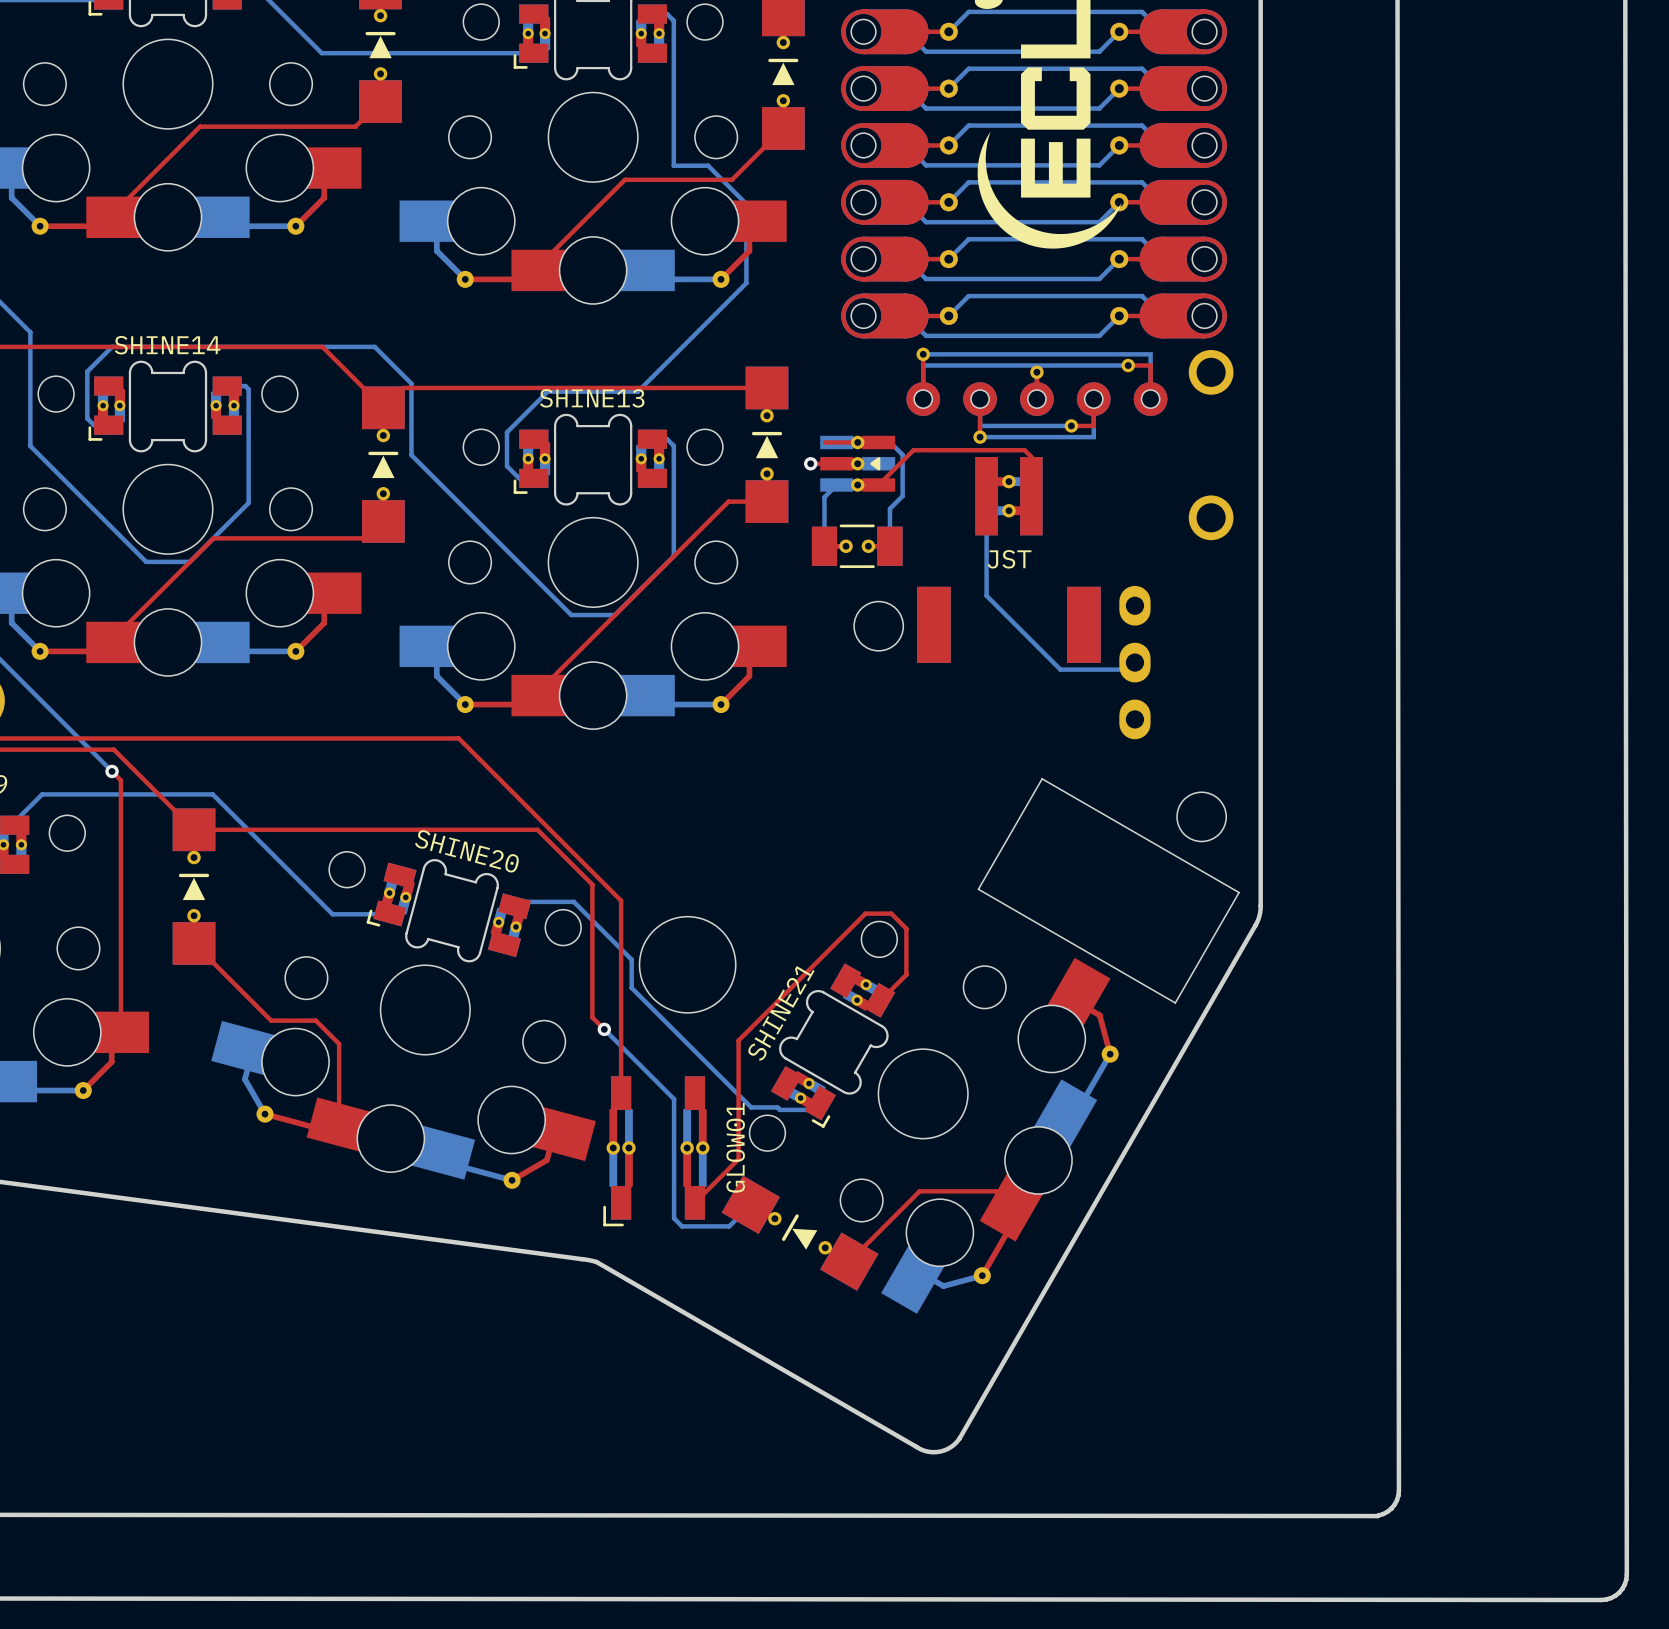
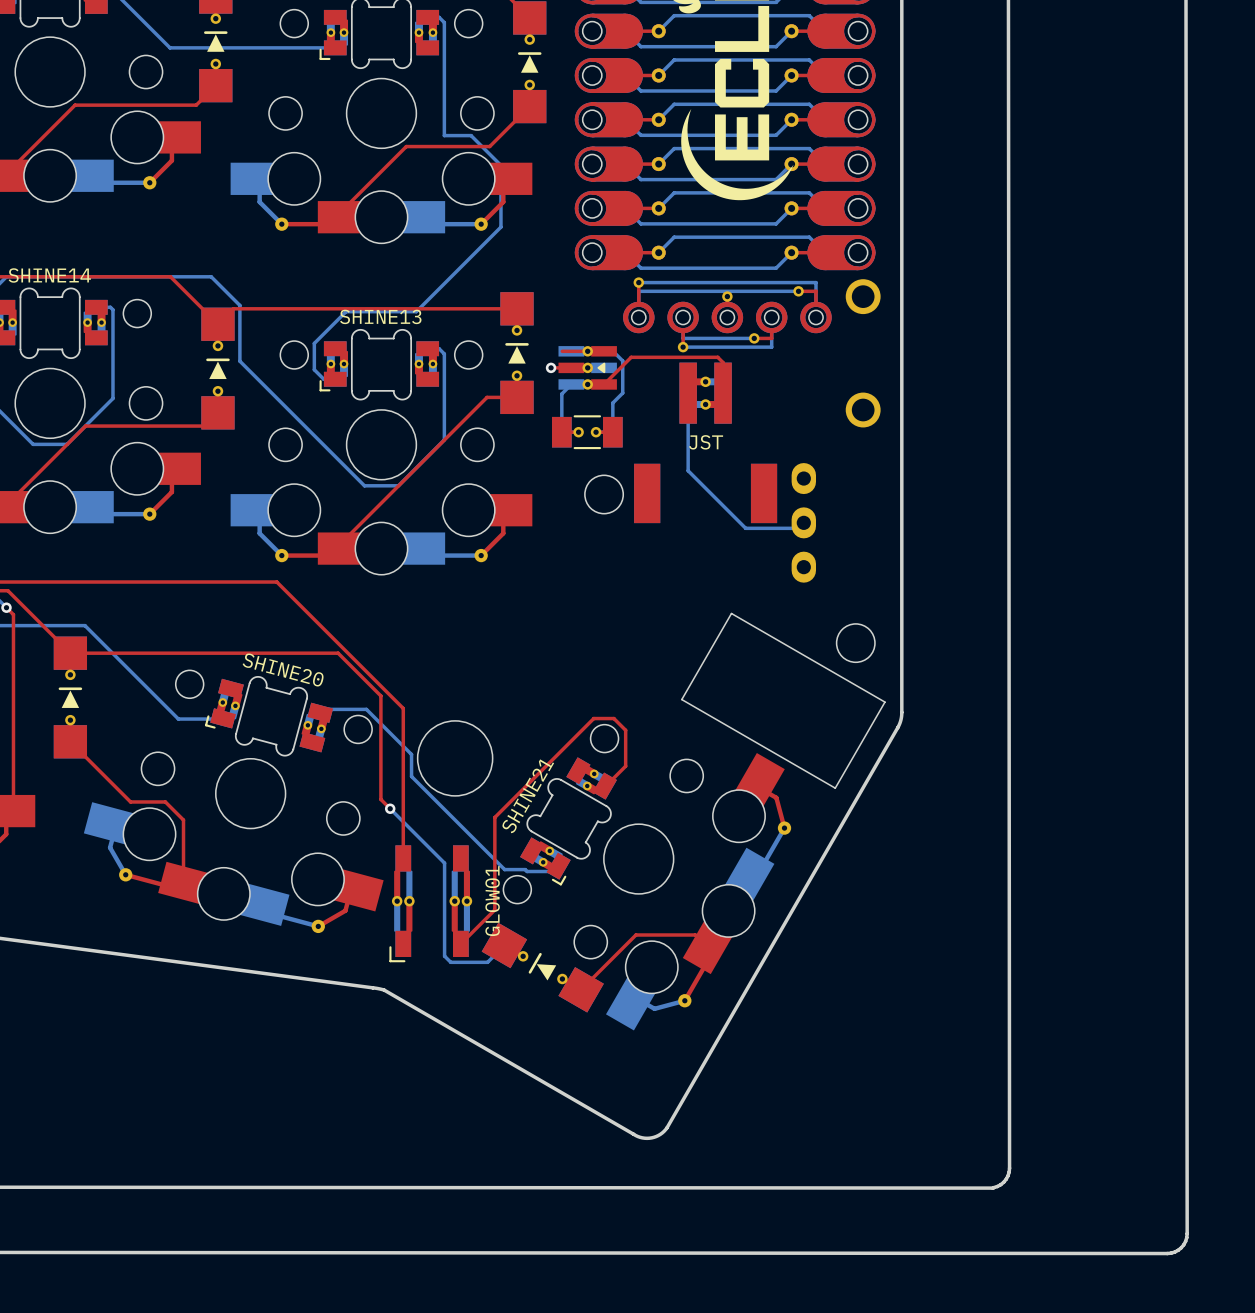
part footprint: [906, 347, 1168, 444] -> [623, 277, 832, 353]

